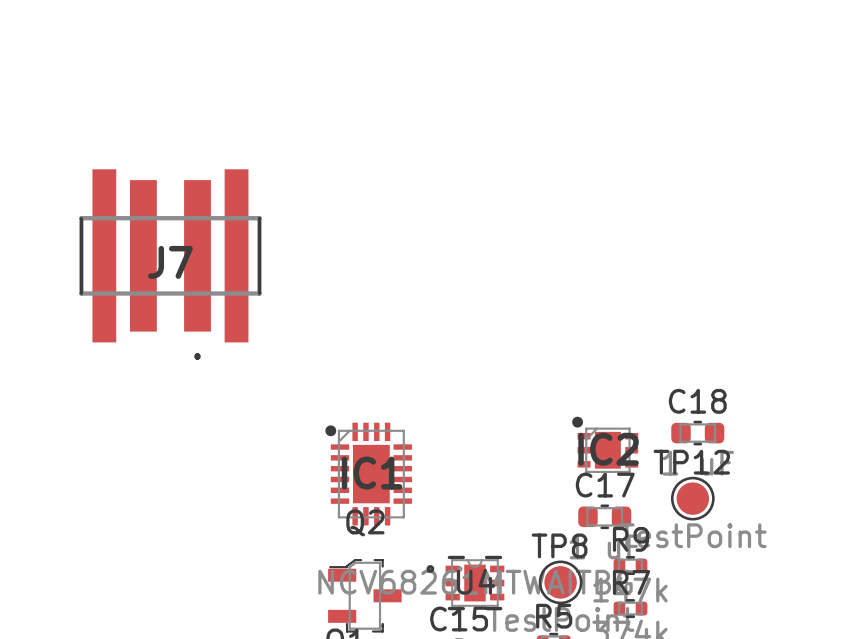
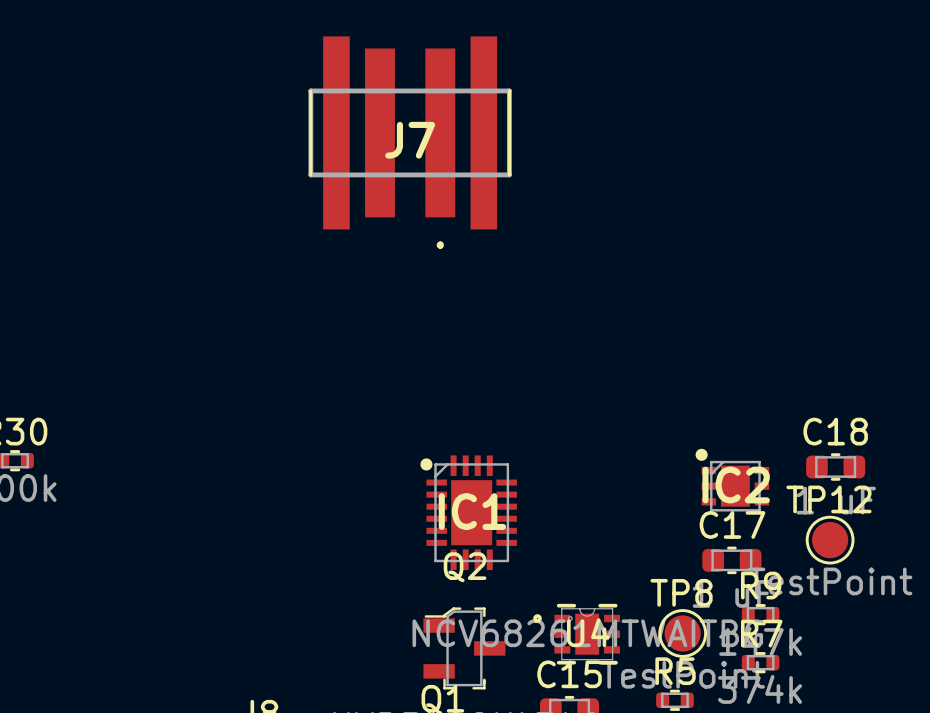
J7 position: (170, 264) -> (410, 142)

